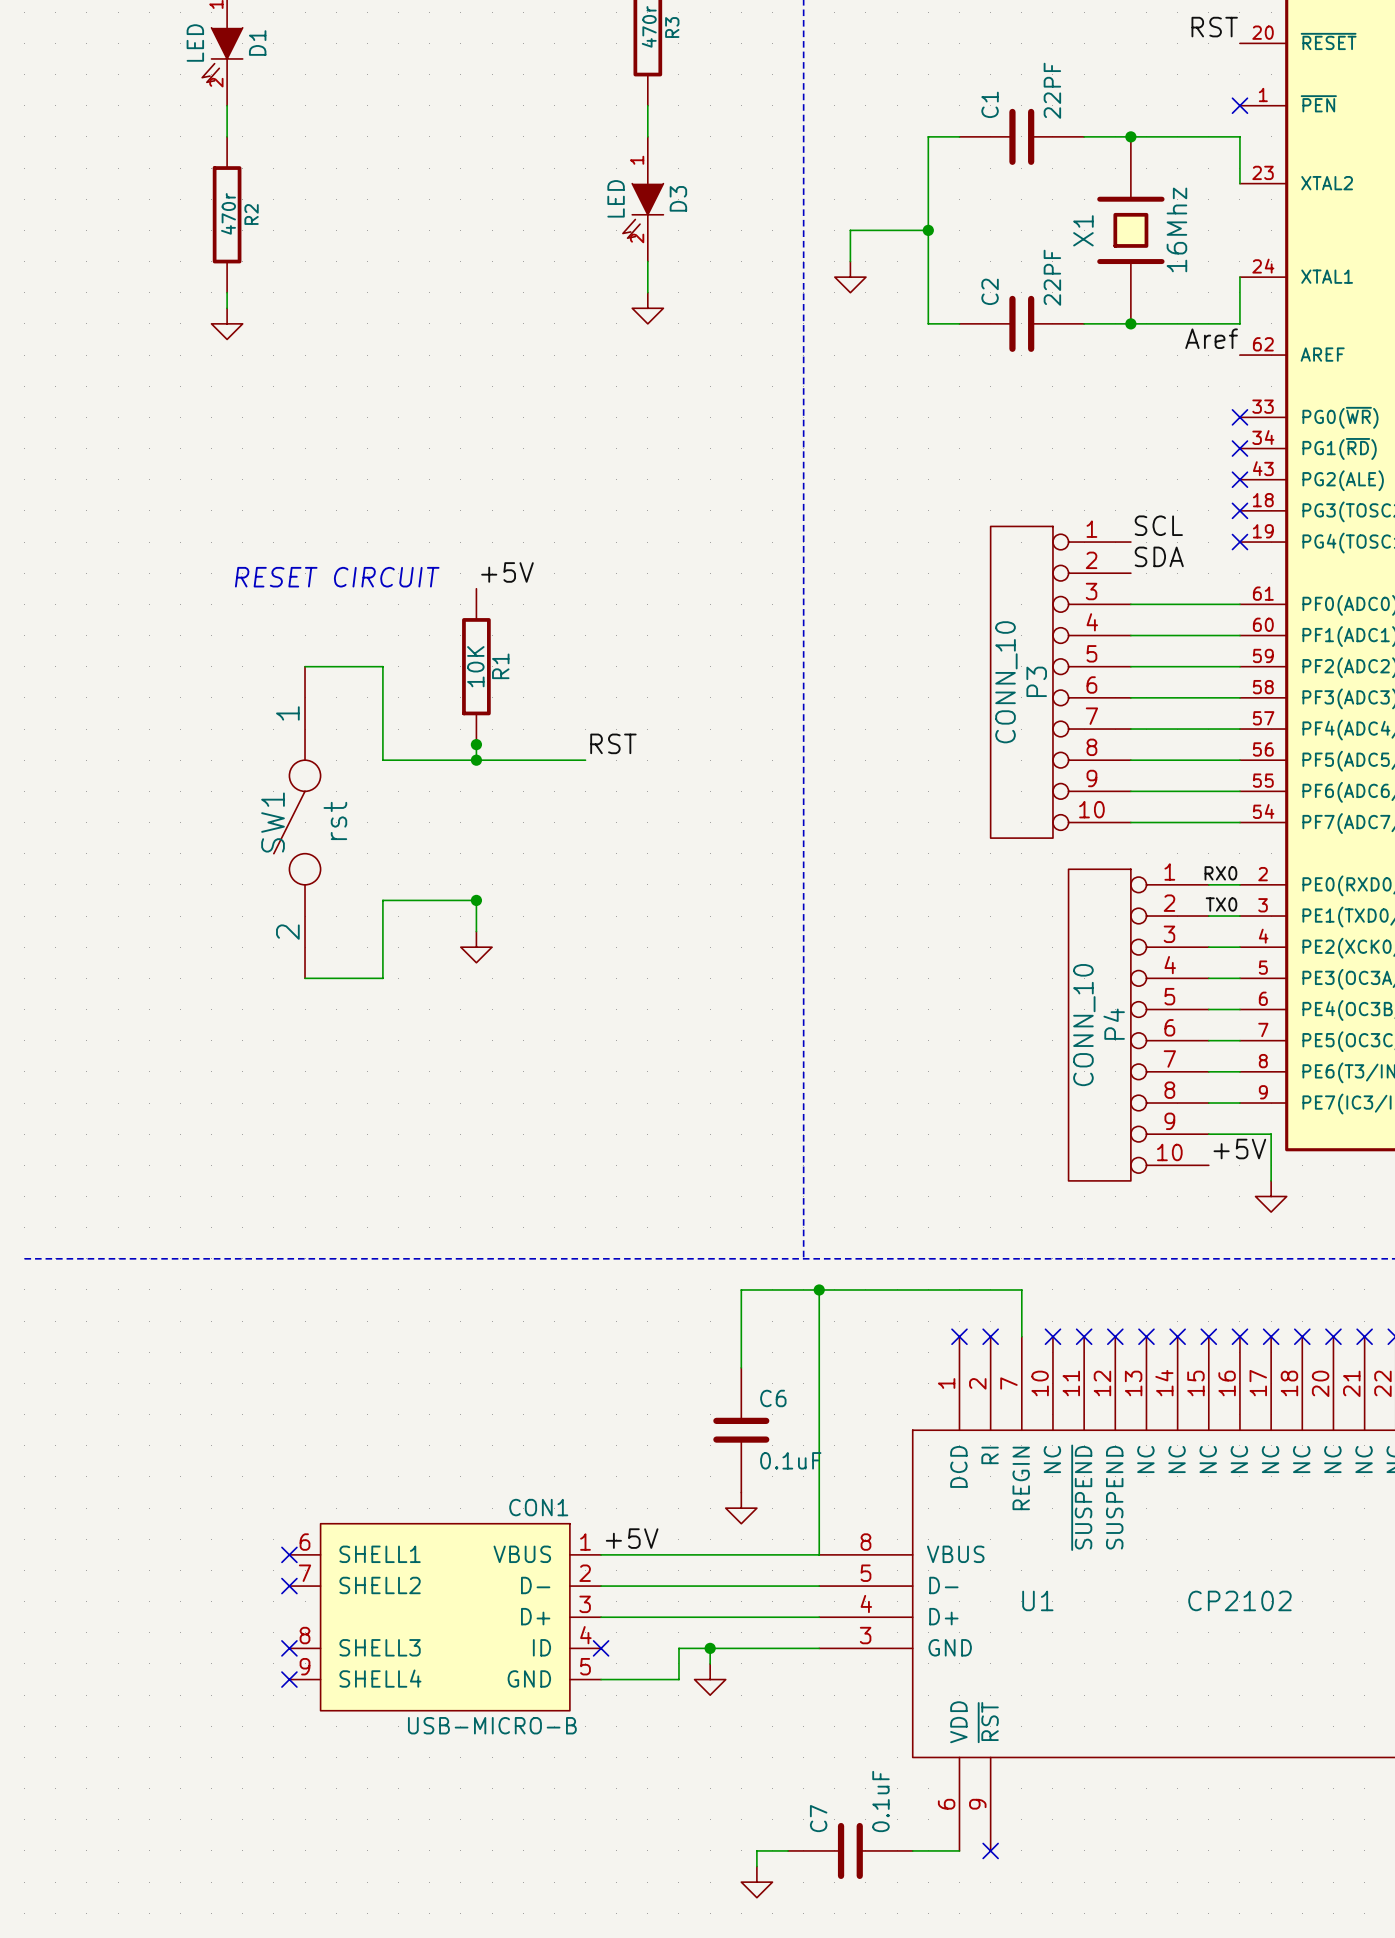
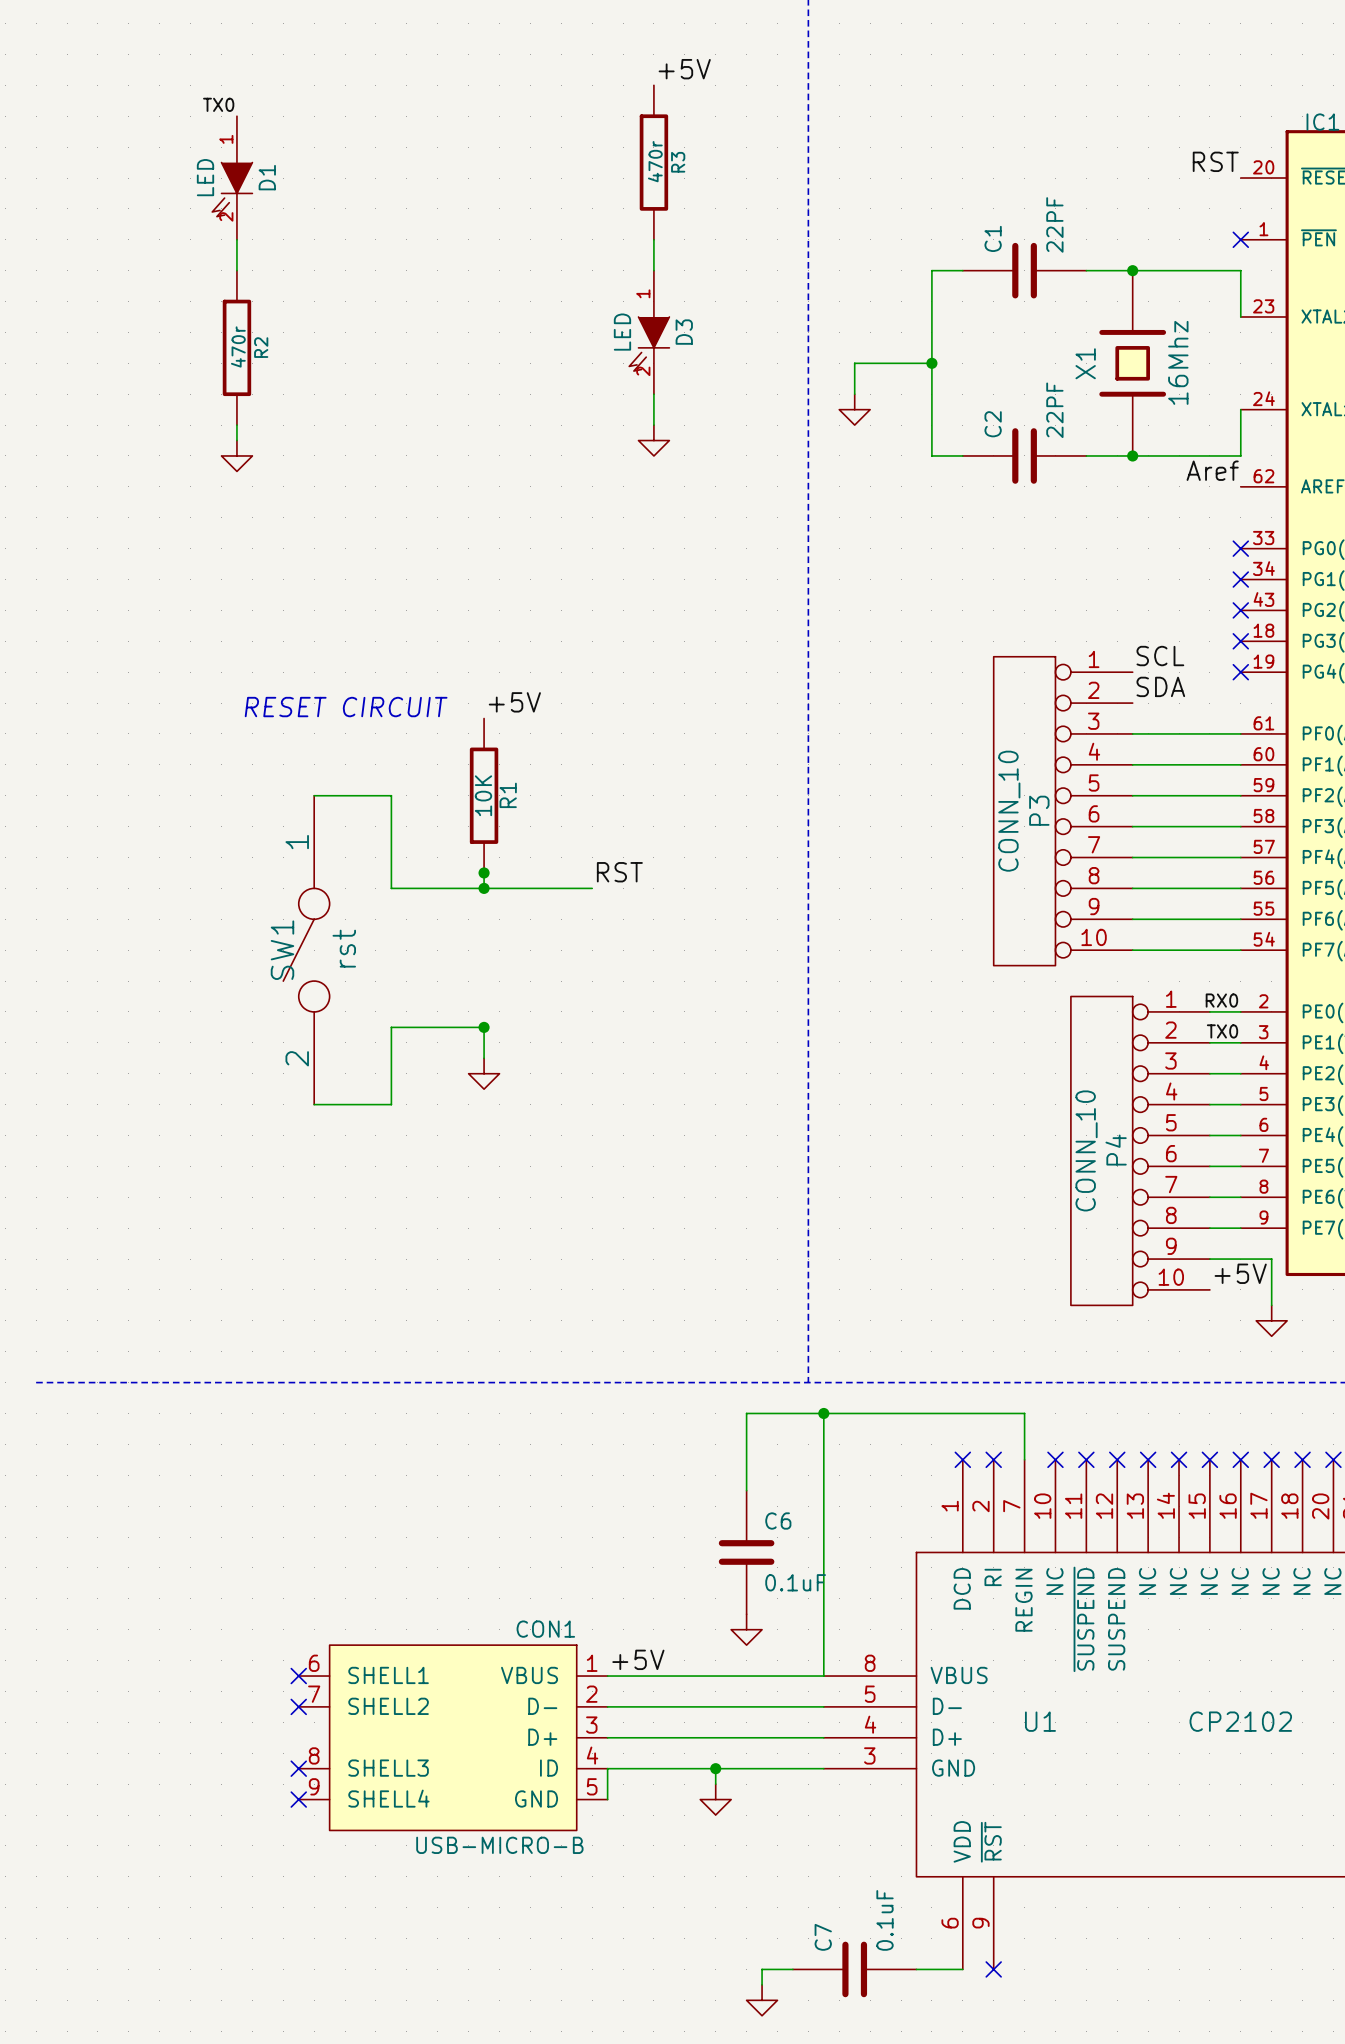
no-connect mark: (601, 1648) -> none
wire: (678, 1648) (678, 1679) (601, 1679) -> (684, 1768) (607, 1768) (607, 1799)

